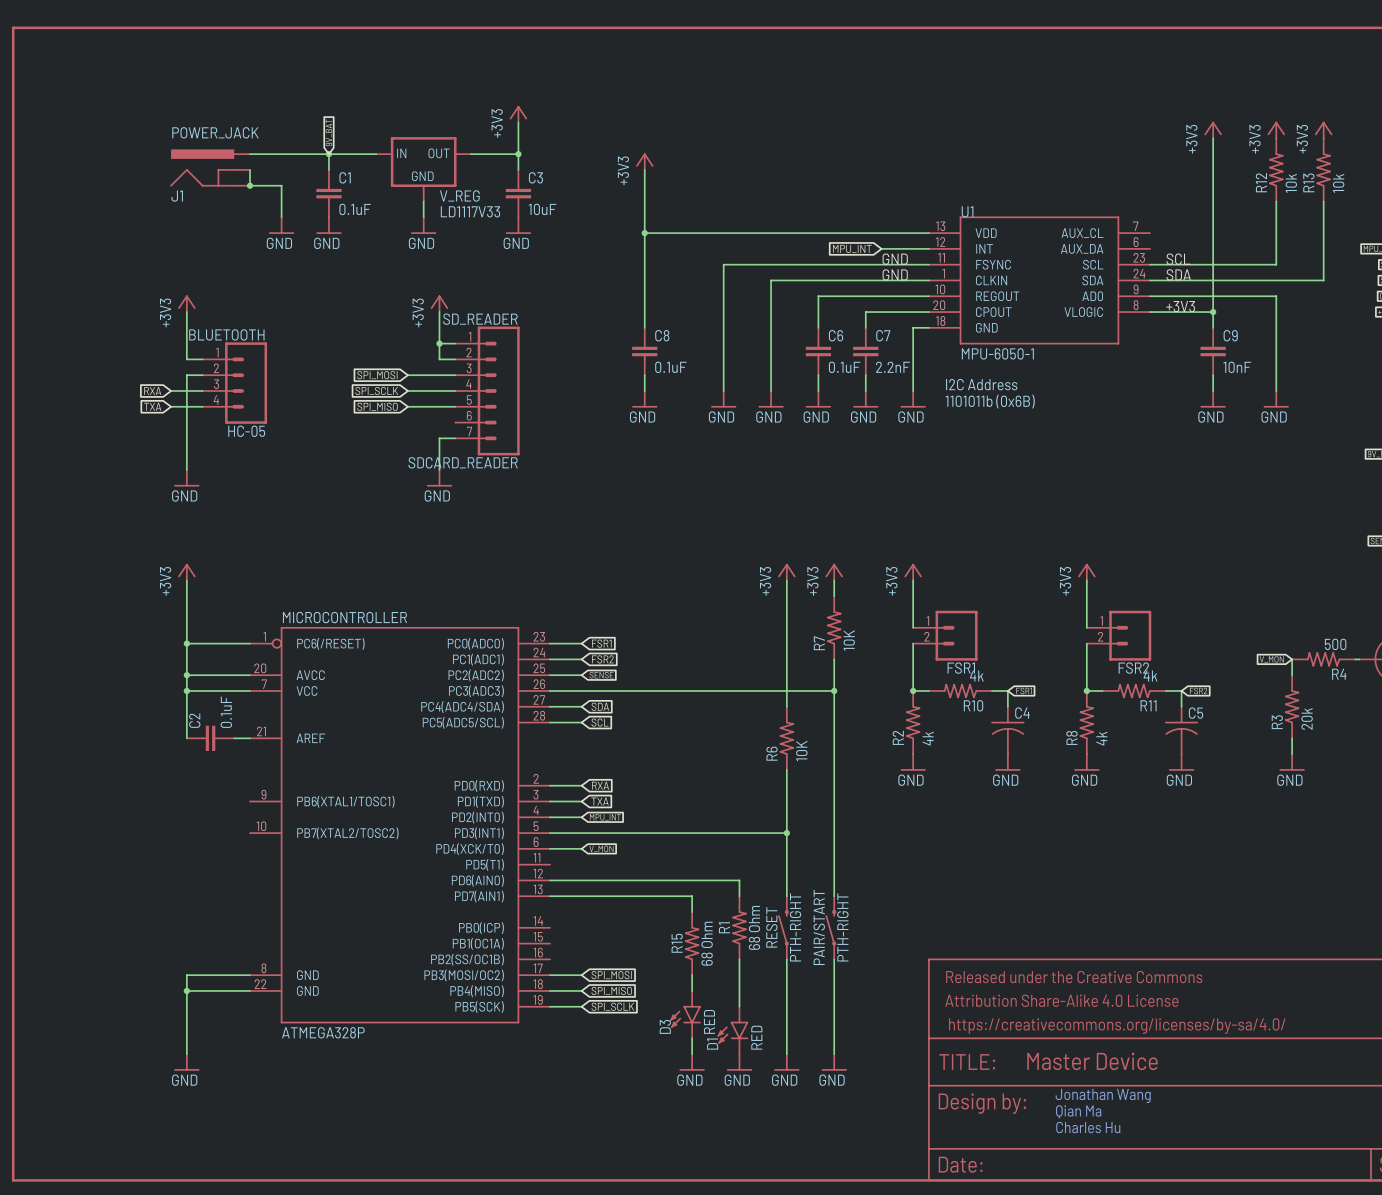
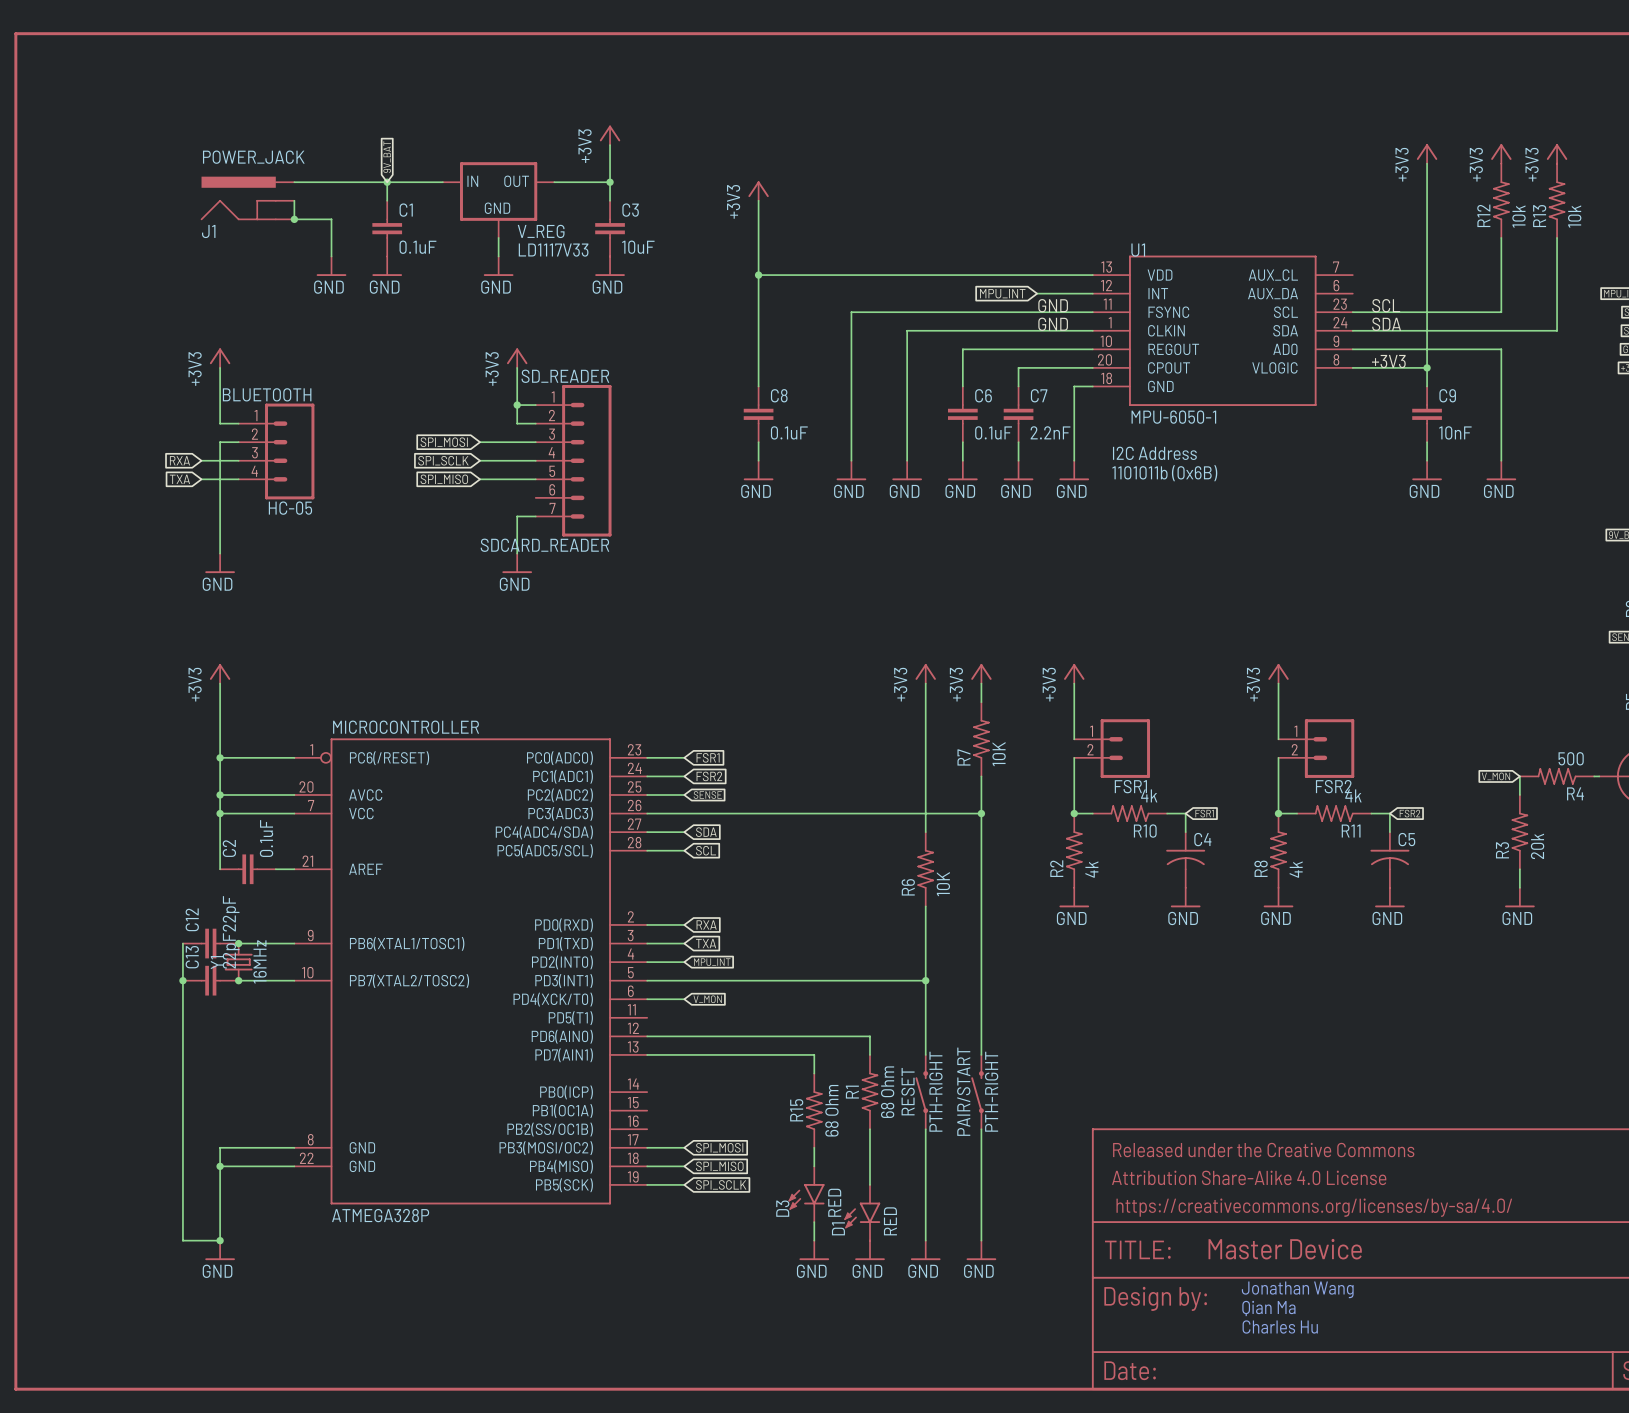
wire: none -> (182, 943) (182, 1240) (220, 1240)
C12: none -> 22pF (210, 943)
wire: none -> (238, 943) (294, 943)
junction: none -> (238, 943)
Y1: none -> 16MHz (238, 962)
junction: none -> (182, 980)
C13: none -> 22pF (210, 980)
wire: none -> (238, 980) (294, 980)
junction: none -> (238, 980)
junction: none -> (220, 1240)

